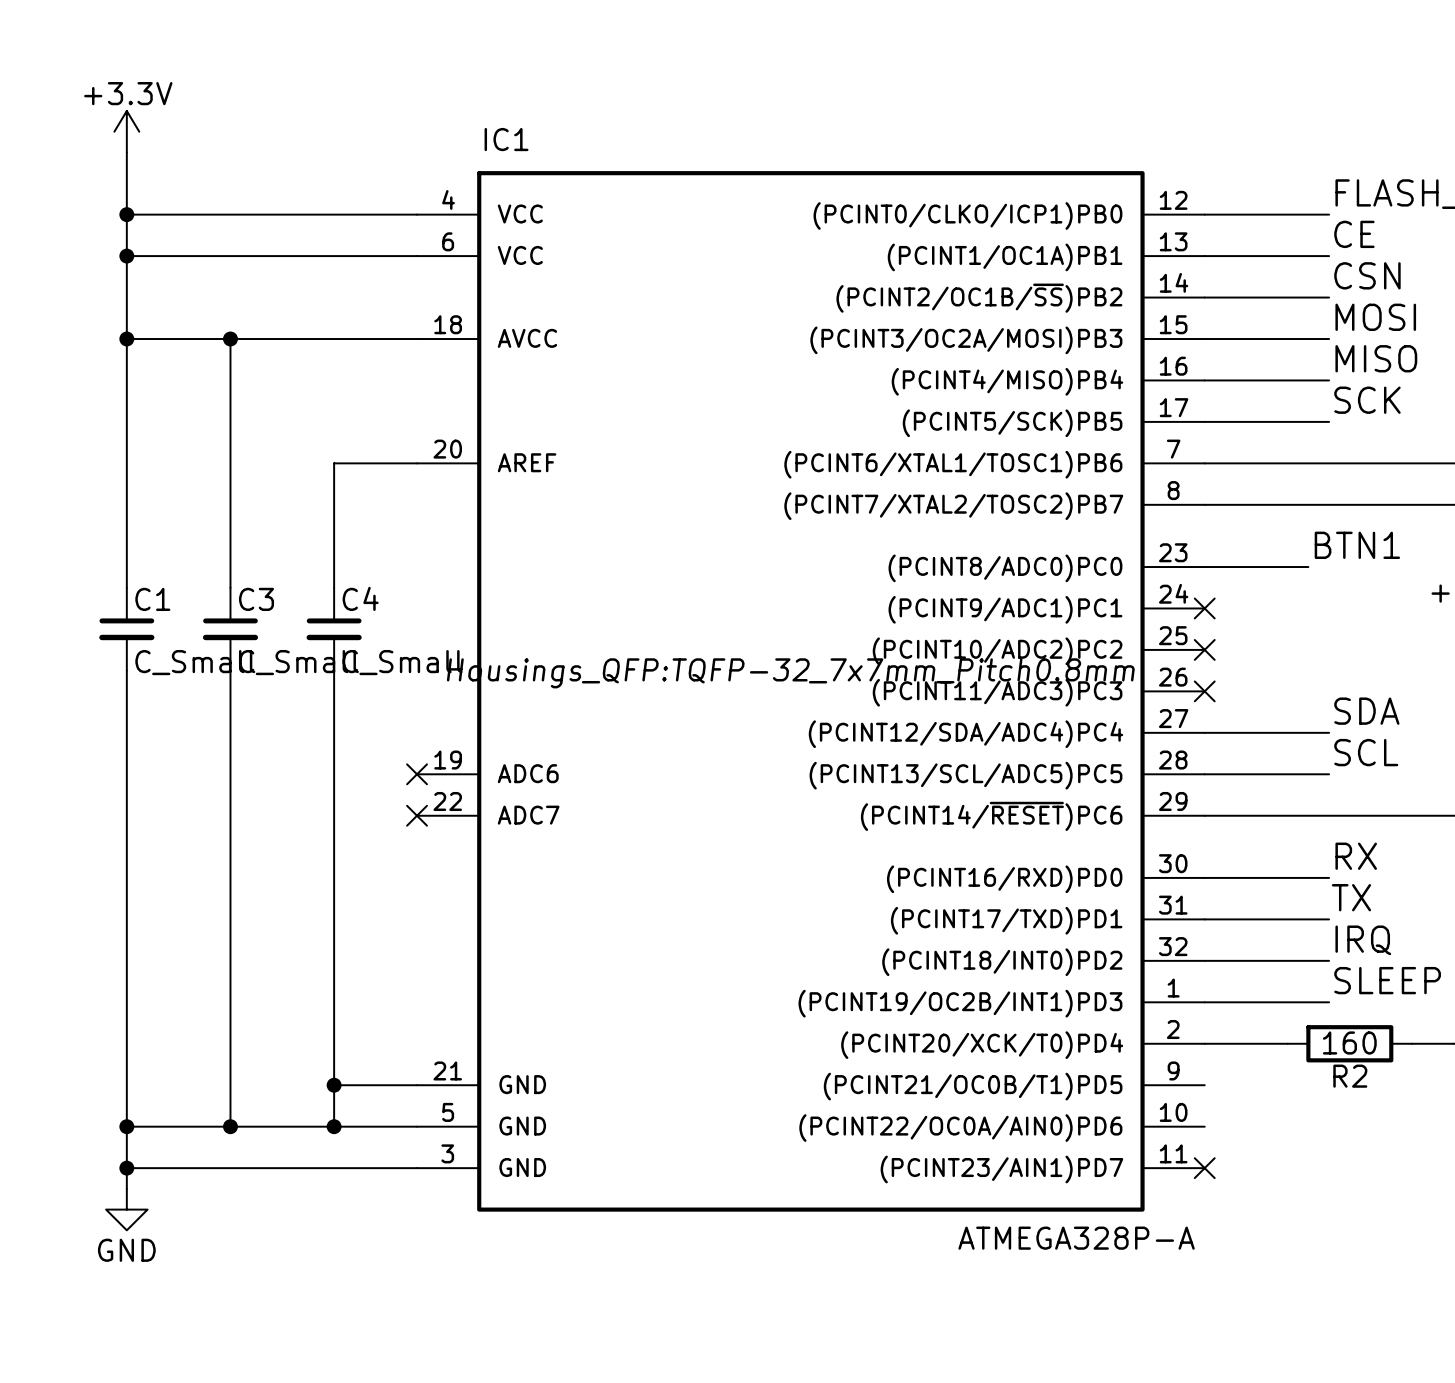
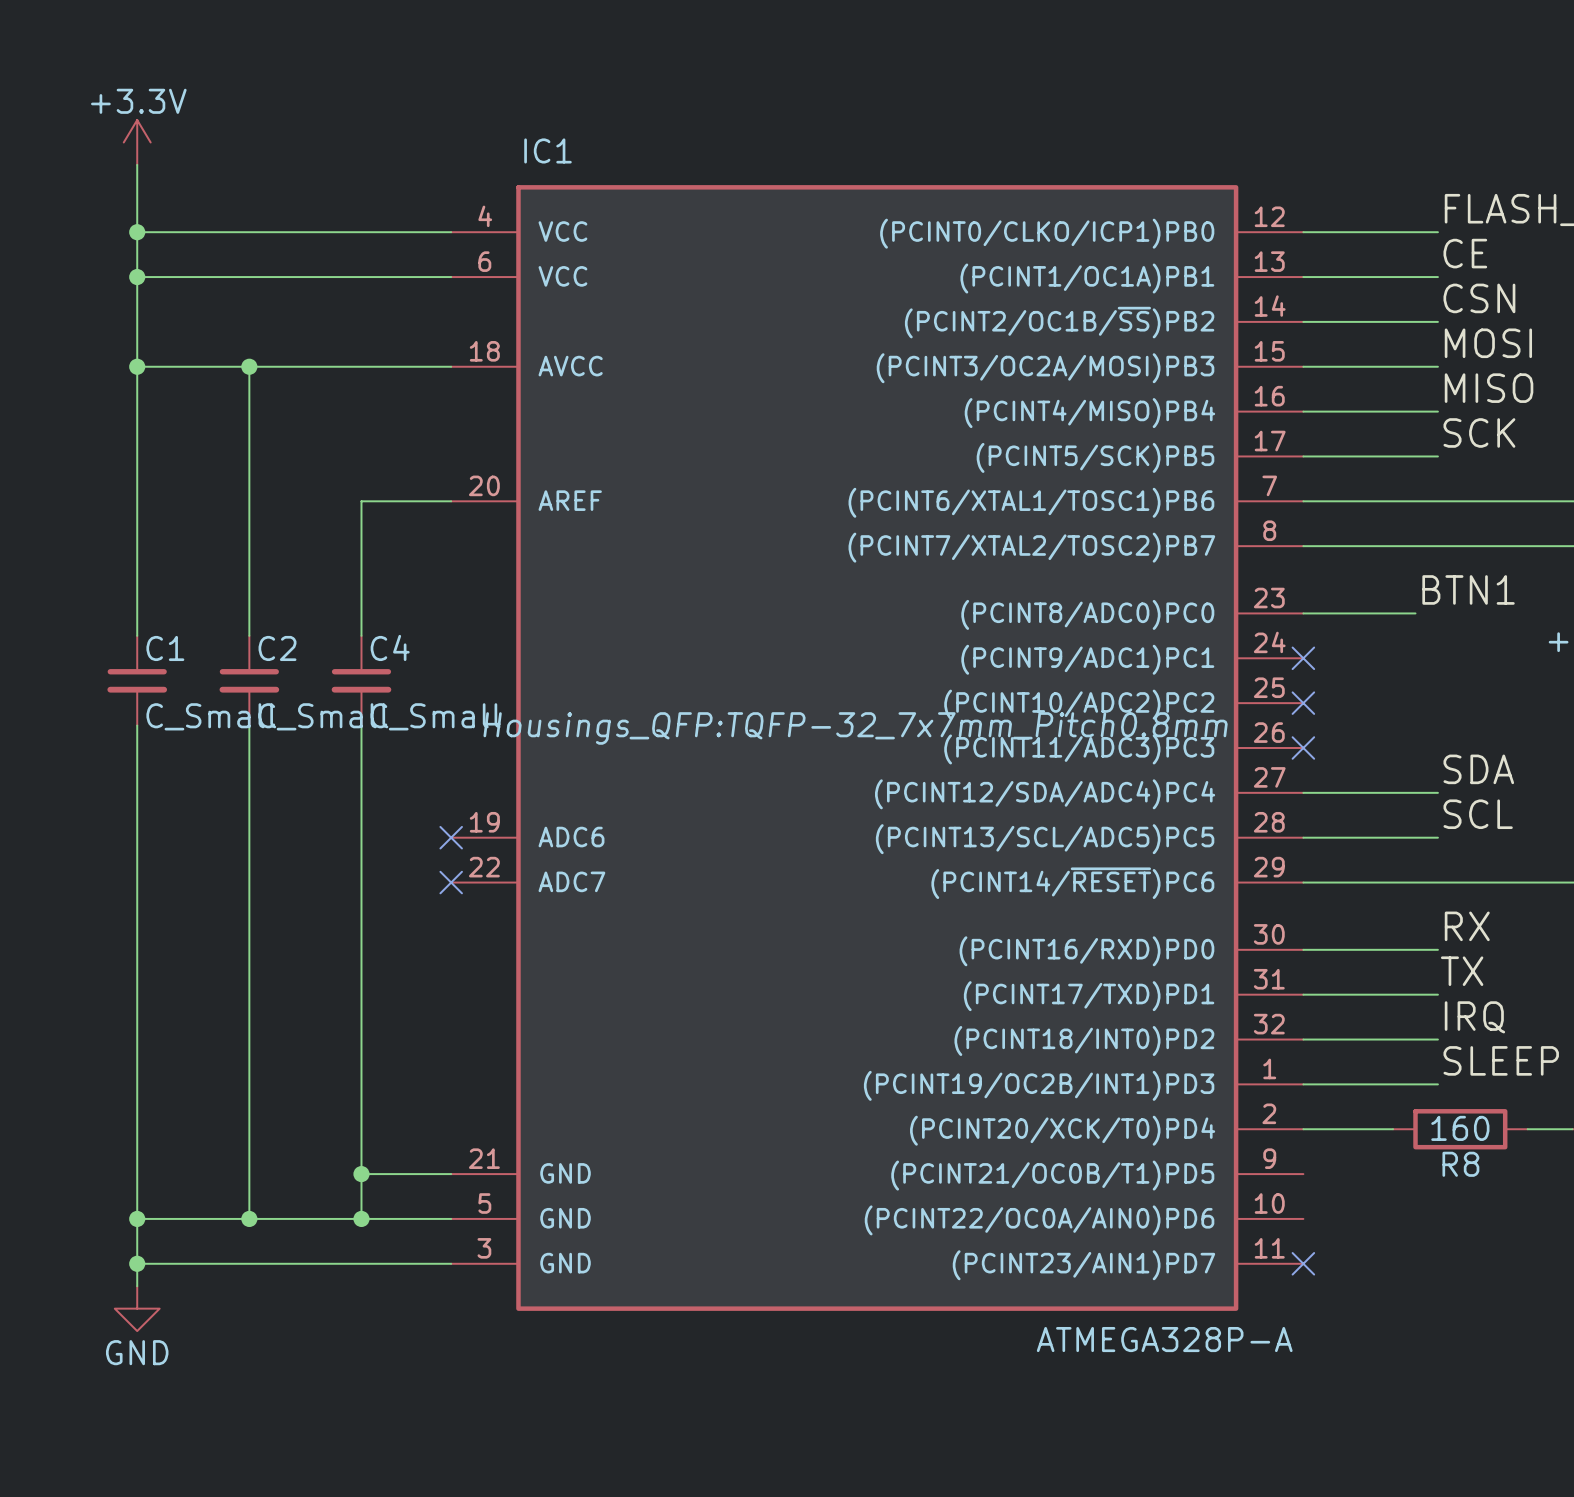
C3 name: C3 (256, 599) -> C2 (277, 648)
R2 name: R2 (1350, 1076) -> R8 (1460, 1164)

